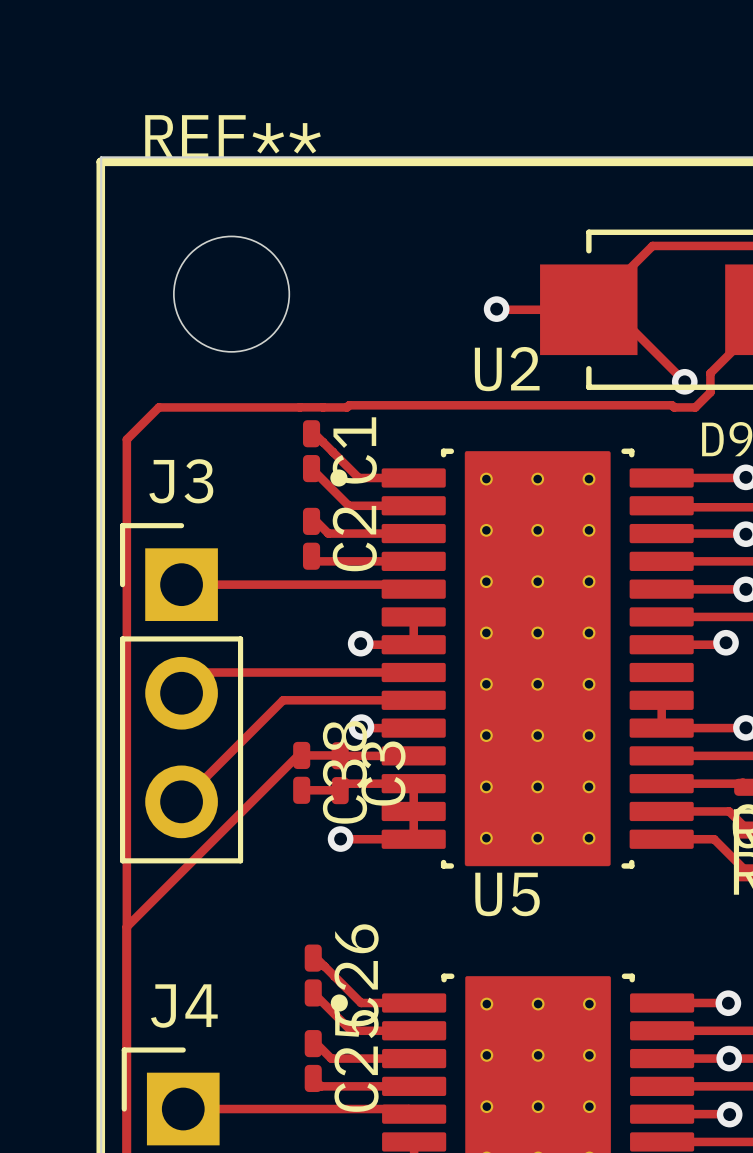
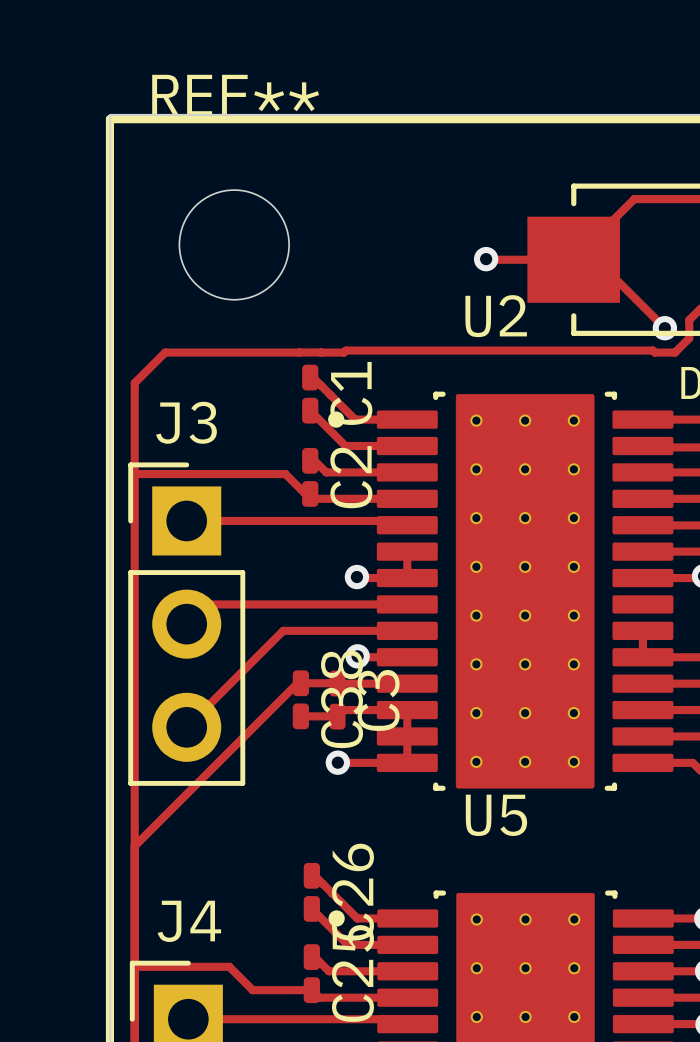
track: none -> (134, 474) (285, 474) (305, 493) (310, 493)
track: none -> (134, 966) (229, 966) (252, 990) (311, 990)

